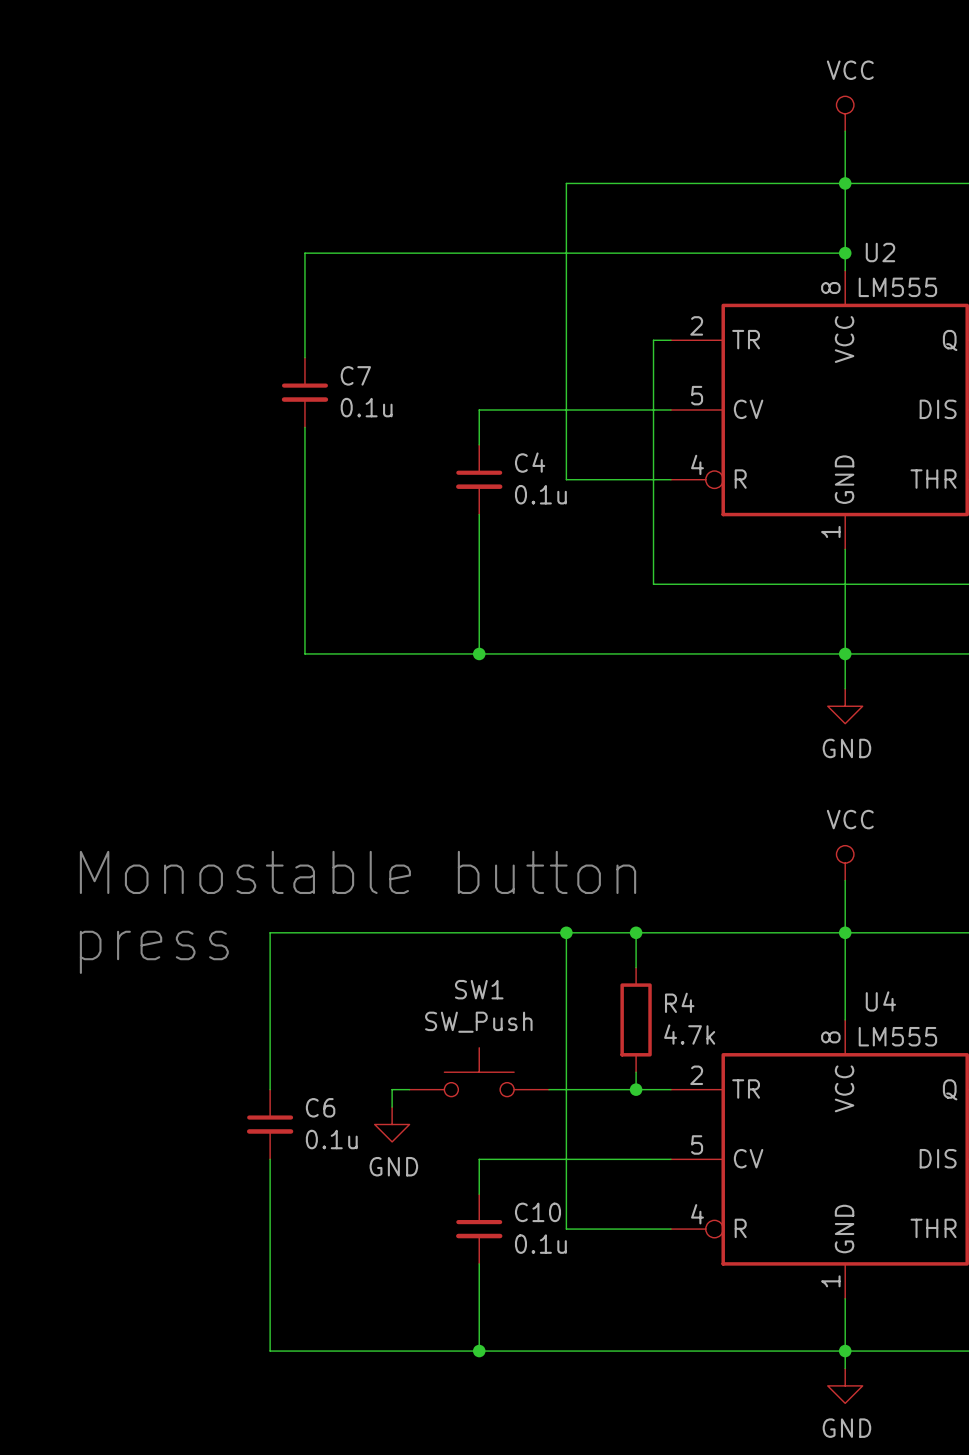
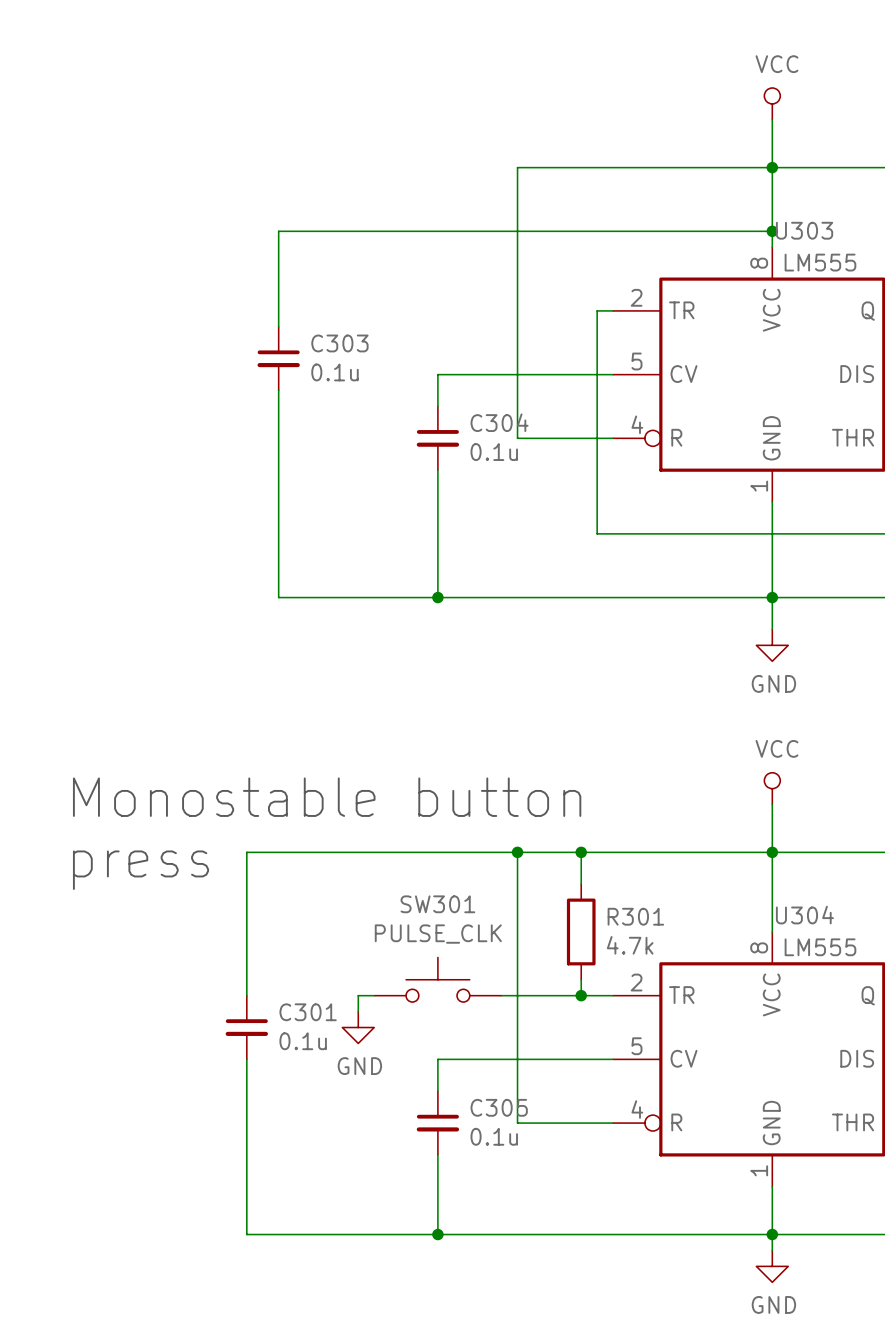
U2 name: U2 (880, 252) -> U303 (804, 230)
C7 name: C7 (355, 375) -> C303 (339, 343)
C4 name: C4 (530, 462) -> C304 (499, 422)
SW1 name: SW1 (479, 989) -> SW301 (437, 904)
U4 name: U4 (880, 1001) -> U304 (804, 915)
R4 name: R4 (679, 1002) -> R301 (635, 916)
SW1 value: SW_Push (478, 1022) -> PULSE_CLK (438, 934)
C6 name: C6 (320, 1107) -> C301 (308, 1012)
C10 name: C10 (537, 1212) -> C305 (499, 1107)

